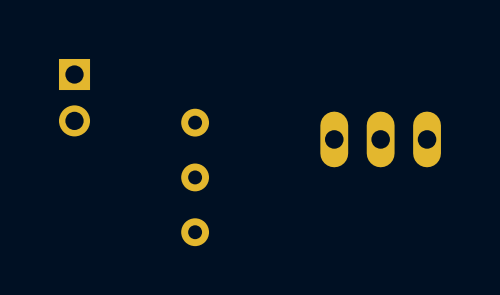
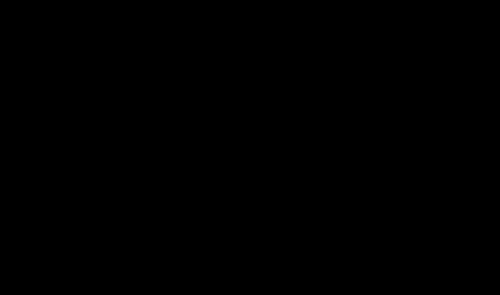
part: (74, 97) -> none
part: (380, 139) -> none
part: (195, 177) -> none

